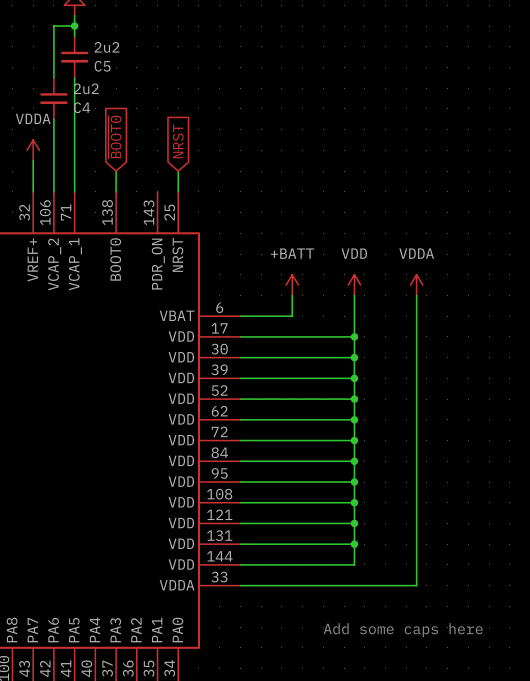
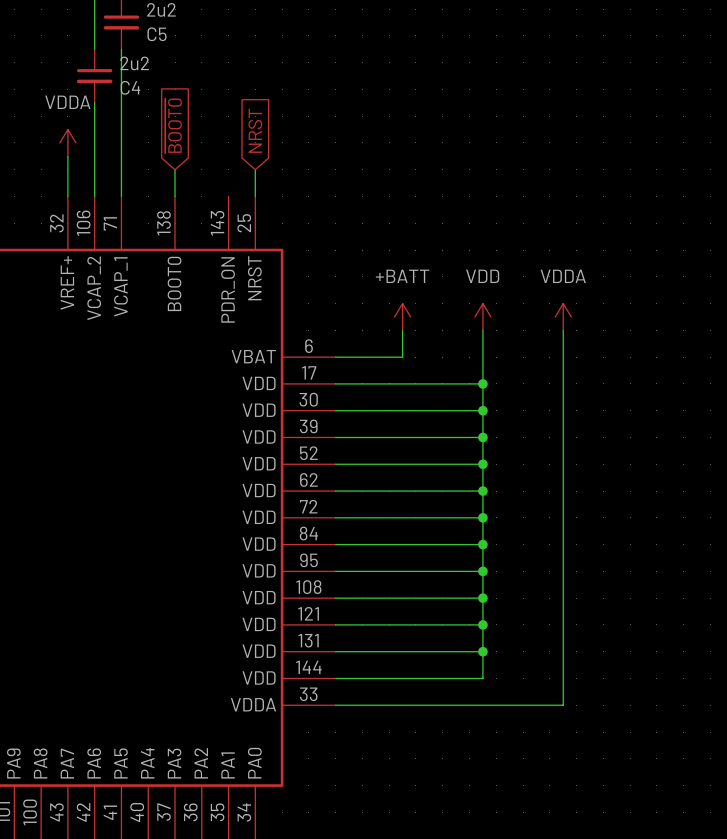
text: Add some caps here (403, 630) -> none

